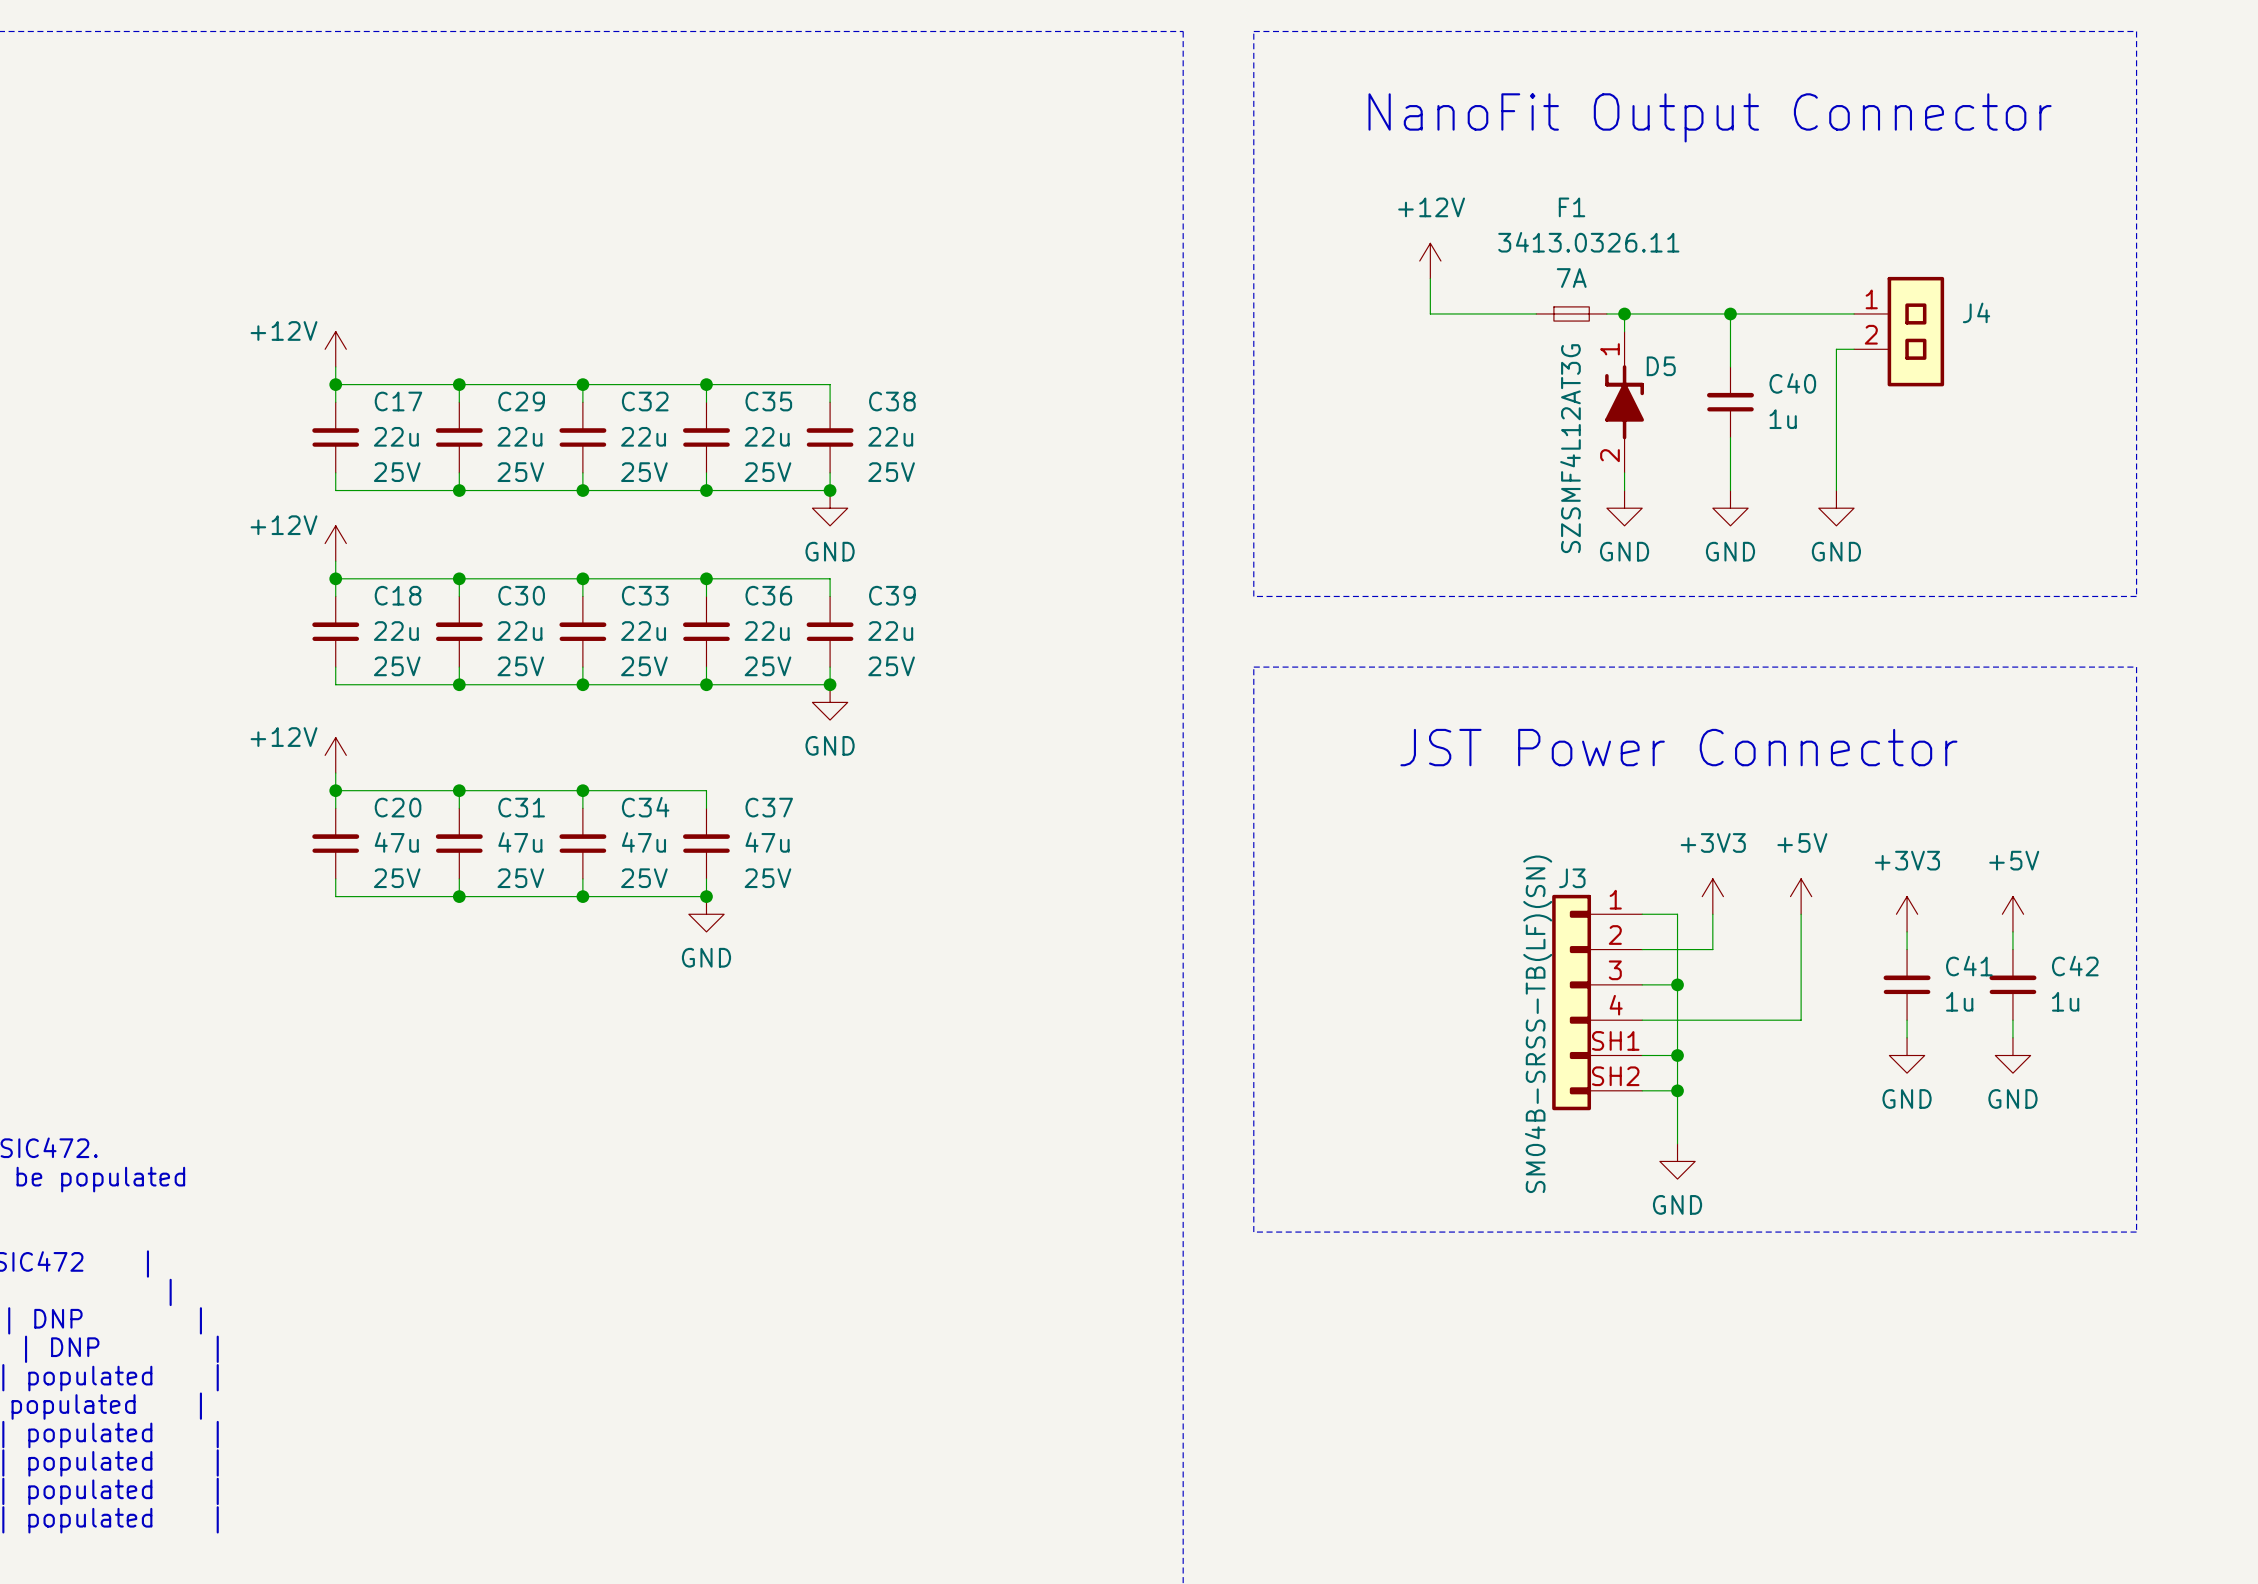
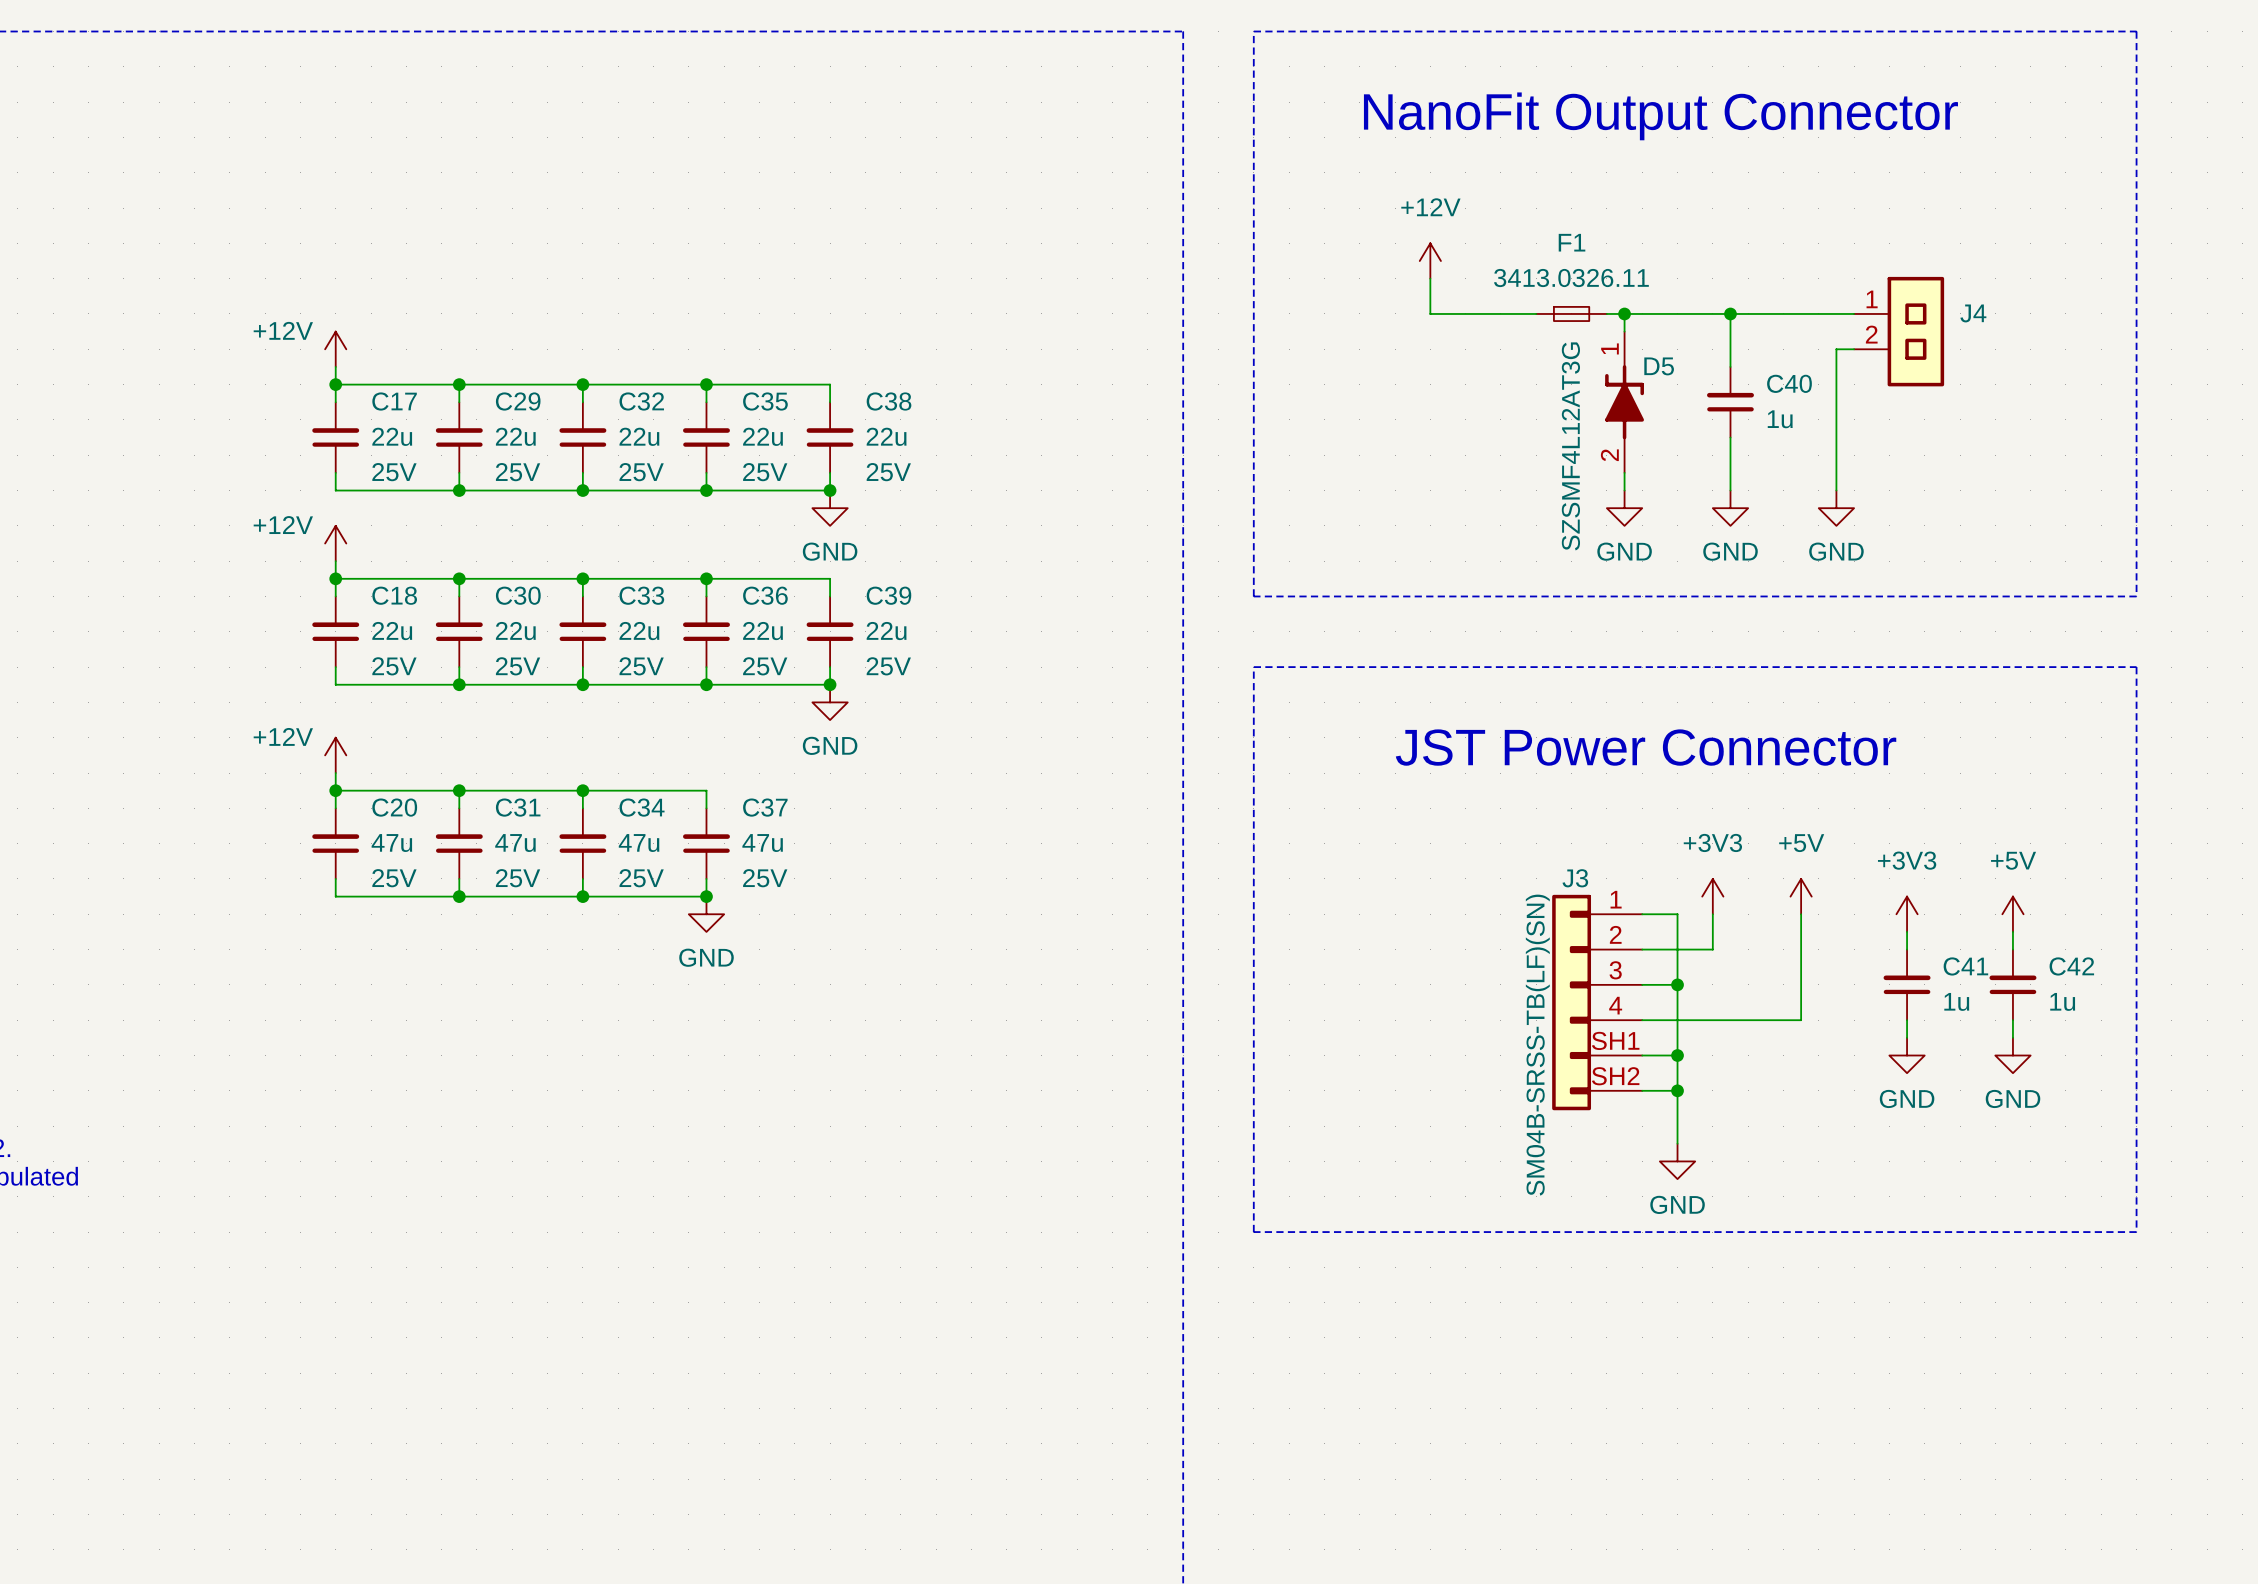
F1 name position: F1 (1572, 207) -> F1 (1572, 242)
F1 text position: 3413.0326.11 (1588, 242) -> 3413.0326.11 (1571, 278)
F1 text: 7A (1571, 278) -> none

